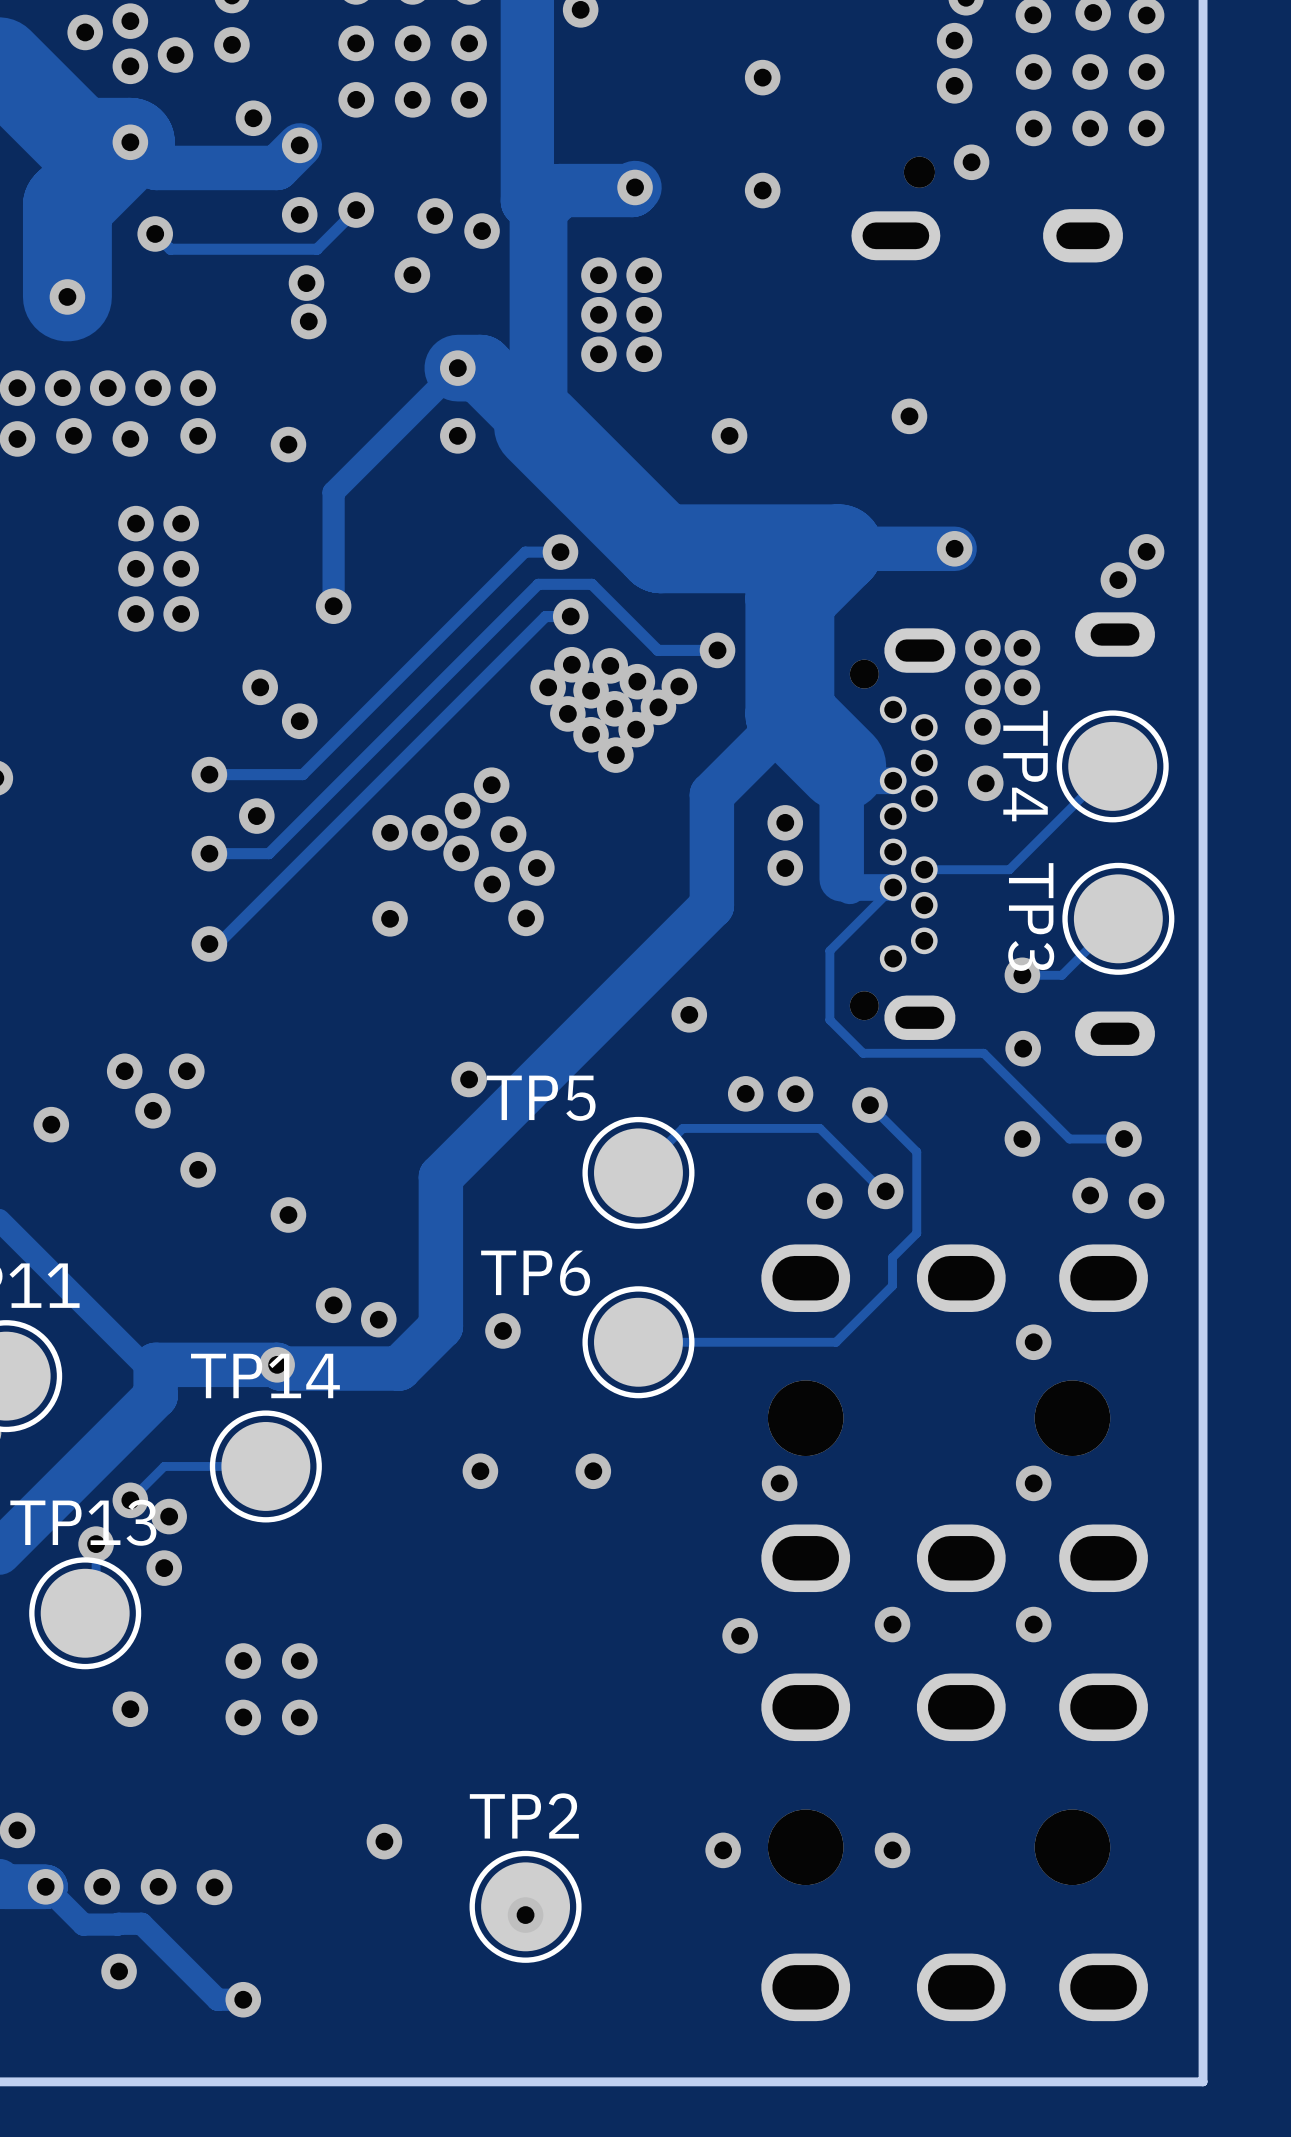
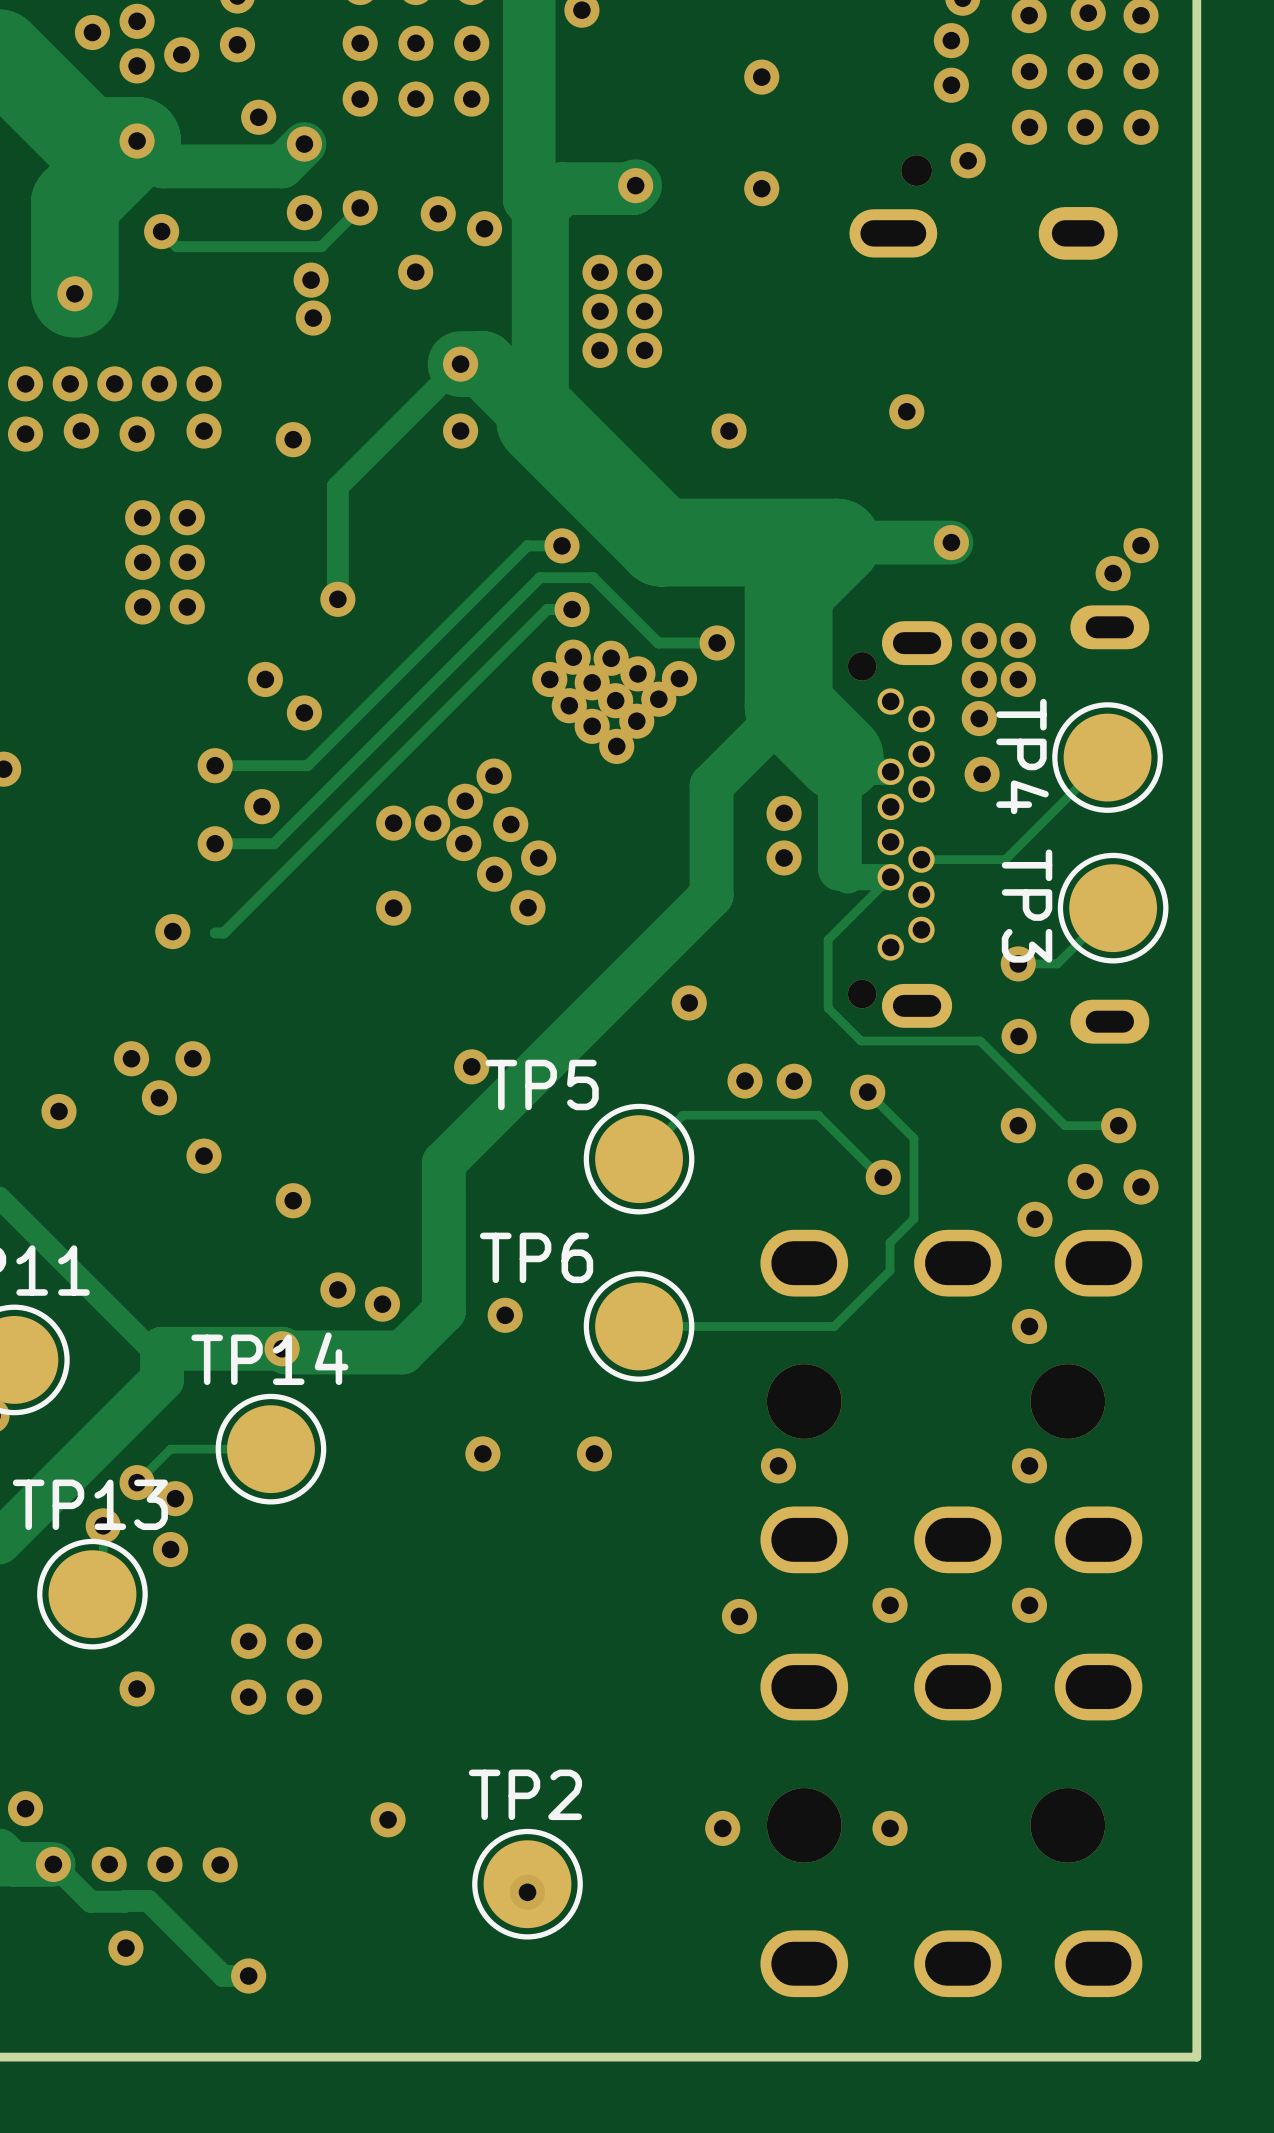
via position: (209, 943) -> (172, 931)
via position: (824, 1201) -> (1035, 1219)

